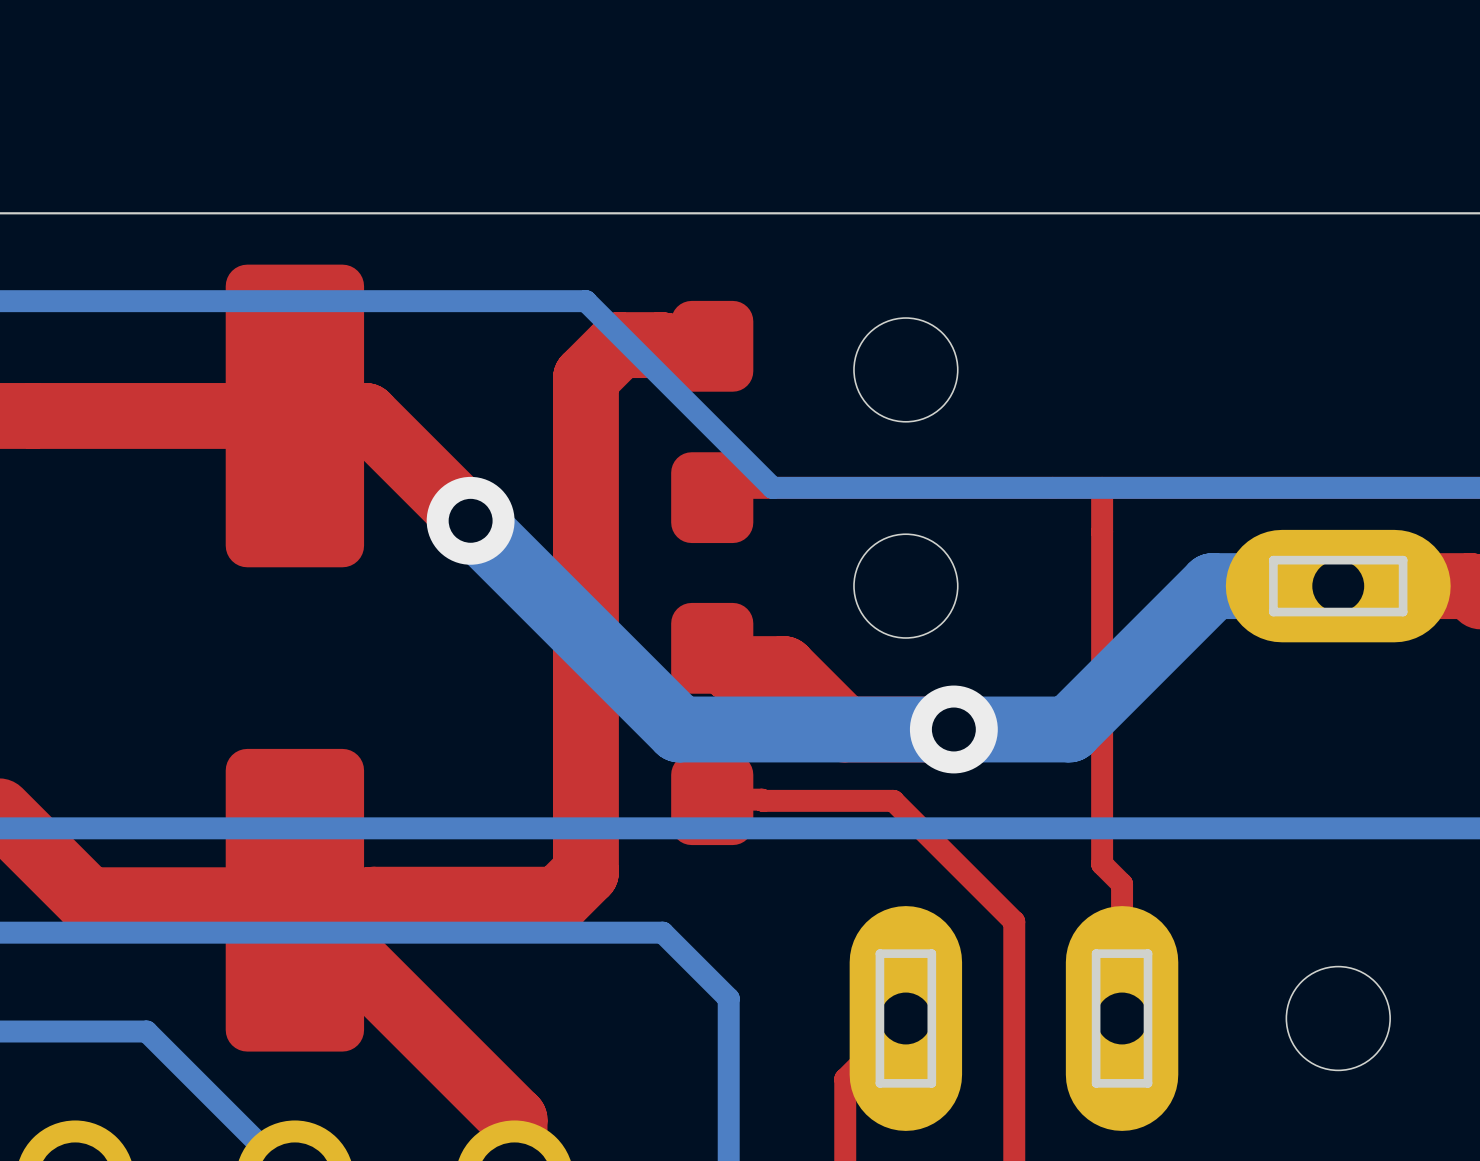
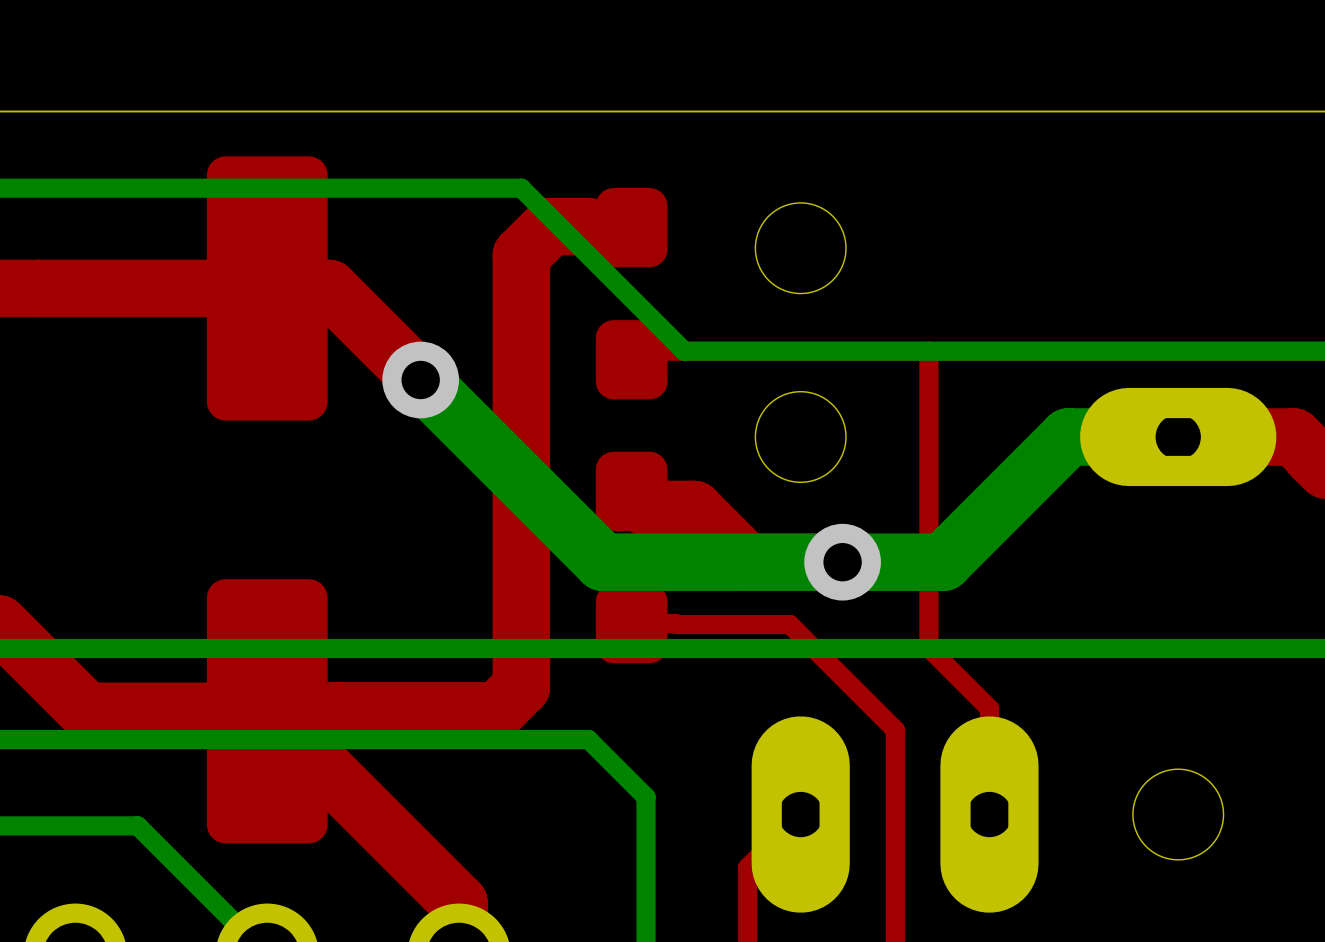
top track: (1102, 487) (1102, 864) (1122, 884) (1122, 897) -> (928, 351) (928, 647) (989, 708)

